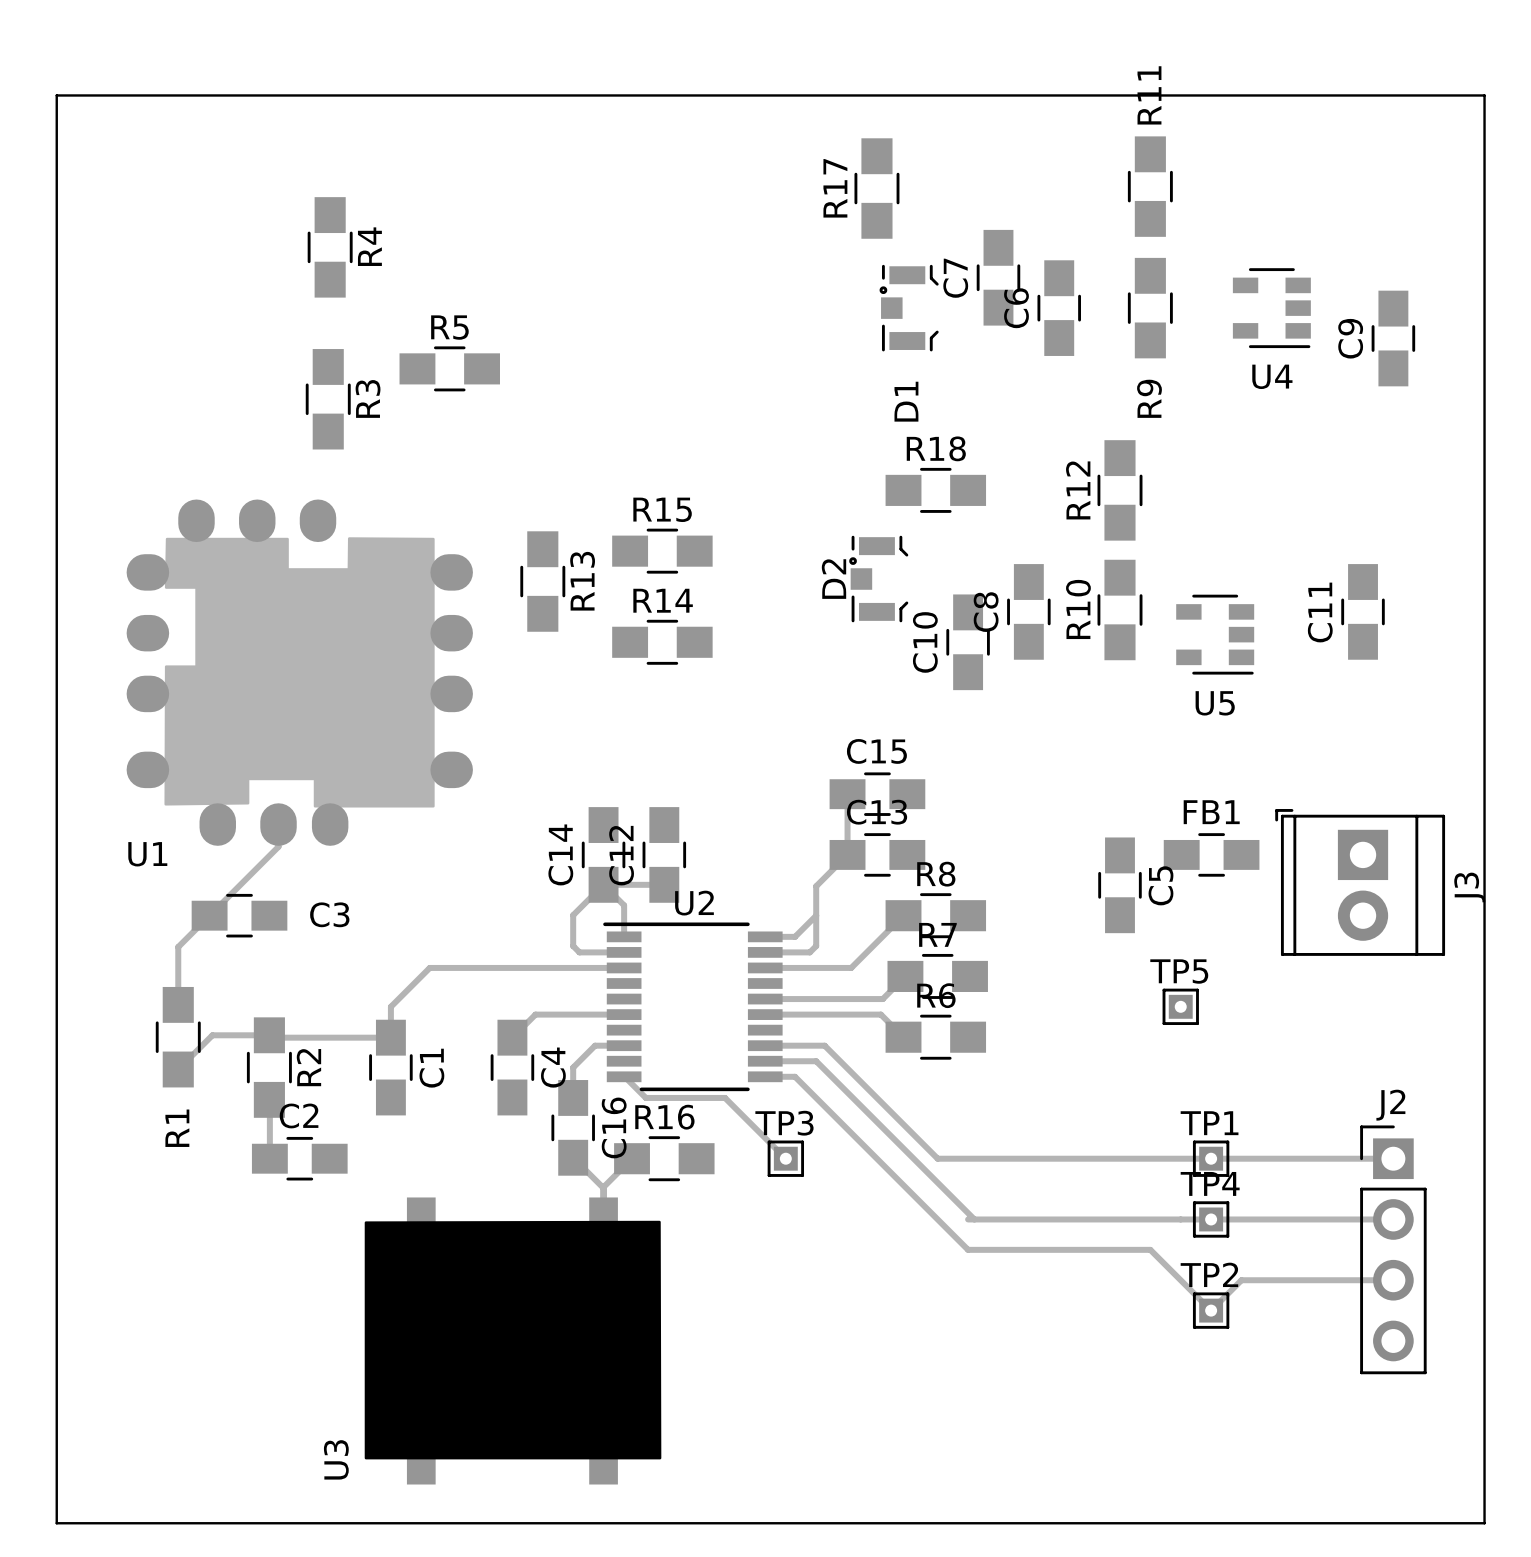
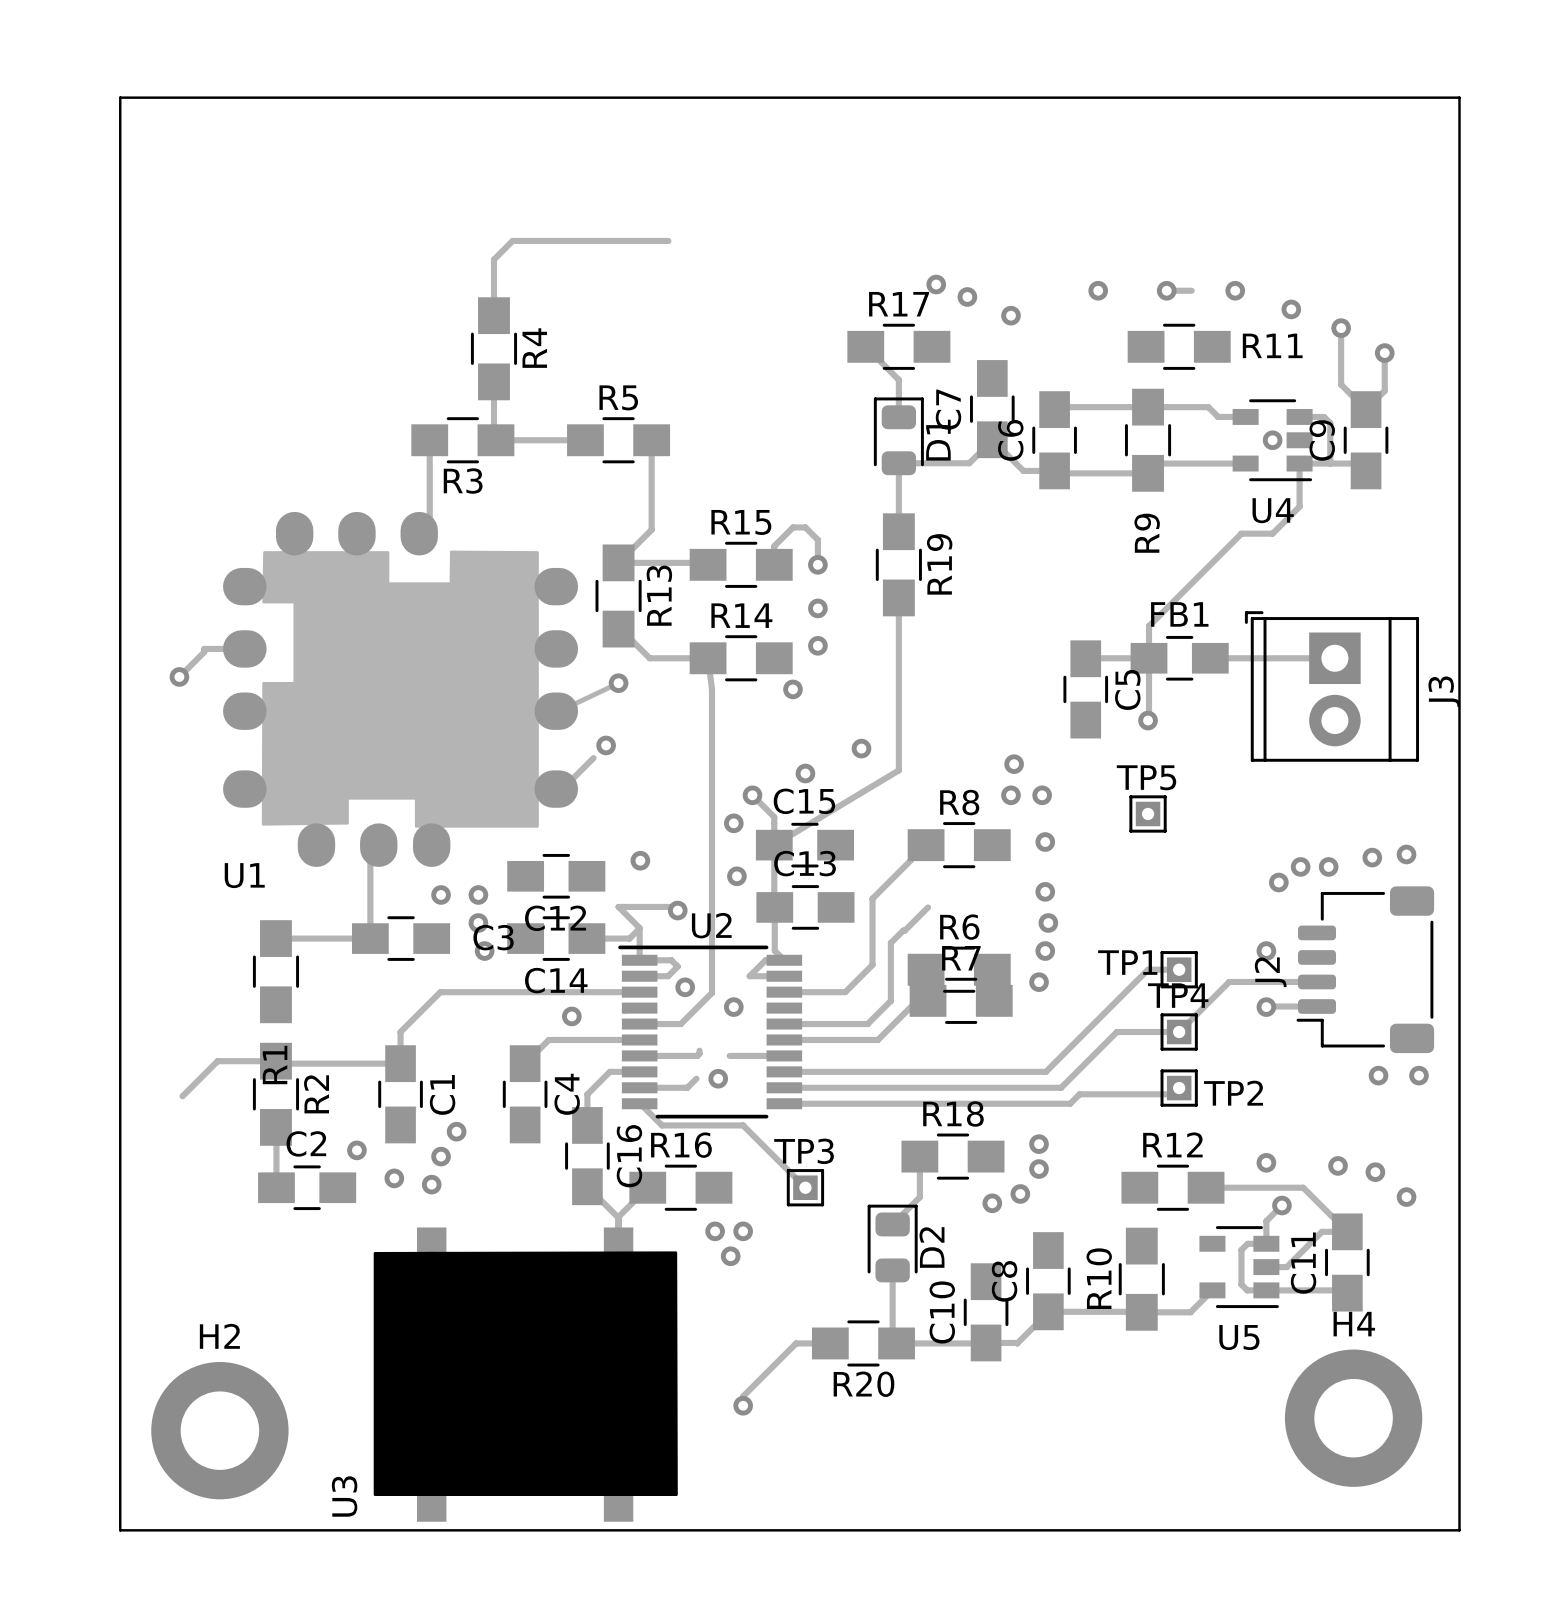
board edge: (117, 95) (56, 95) (56, 1523) (1484, 1523) (1484, 95) (1423, 95) -> (120, 97) (120, 1530) (1459, 1530) (1459, 97)
R11 rotation: 0° (1150, 186) -> 90° clockwise (1179, 346)
R11 position: (1150, 186) -> (1179, 346)
R17 rotation: 0° (876, 188) -> 90° clockwise (898, 346)
R17 position: (876, 188) -> (898, 346)
track: none -> (668, 240) (512, 240) (493, 259) (493, 315)
R4 position: (330, 247) -> (493, 348)
D1 footprint: [879, 264, 939, 352] -> [873, 397, 924, 476]
via: none -> (936, 284)
C7 position: (998, 277) -> (992, 409)
via: none -> (1098, 290)
track: none -> (1166, 290) (1191, 290)
via: none -> (1166, 290)
via: none -> (1235, 290)
via: none -> (967, 296)
via: none -> (1291, 309)
via: none -> (1011, 315)
C6 position: (1059, 308) -> (1054, 440)
R9 position: (1150, 308) -> (1148, 440)
U4 position: (1271, 308) -> (1272, 440)
track: none -> (1341, 328) (1341, 384) (1366, 409) (1384, 390) (1384, 353)
via: none -> (1341, 328)
track: none -> (865, 346) (898, 379) (898, 406)
C9 position: (1393, 338) -> (1366, 440)
via: none -> (1384, 353)
R5 position: (449, 368) -> (618, 440)
track: none -> (493, 381) (493, 438) (495, 440) (585, 440)
R3 rotation: 0° (328, 399) -> 90° clockwise (462, 440)
R3 position: (328, 399) -> (462, 440)
track: none -> (1054, 409) (1057, 407) (1208, 407) (1218, 416) (1245, 416)
D1 name position: D1 (906, 401) -> D1 (938, 440)
track: none -> (1299, 416) (1324, 416) (1330, 423) (1330, 463)
track: none -> (429, 440) (429, 523) (419, 533)
track: none -> (651, 440) (651, 529) (618, 562) (706, 562) (708, 564)
track: none -> (992, 439) (1023, 470) (1054, 470) (1057, 473) (1148, 473) (1157, 463) (1245, 463)
track: none -> (992, 440) (969, 463) (898, 463) (898, 531)
via: none -> (1272, 440)
track: none -> (1366, 470) (1358, 463) (1299, 463) (1299, 506) (1272, 533) (1241, 533) (1149, 626) (1148, 720)
R18 position: (935, 490) -> (952, 1156)
R12 rotation: 0° (1119, 490) -> 90° clockwise (1172, 1187)
R12 position: (1119, 490) -> (1172, 1187)
D2 footprint: [849, 535, 909, 623] -> [867, 1204, 918, 1283]
R15 position: (662, 551) -> (741, 564)
track: none -> (774, 564) (774, 546) (792, 527) (805, 527) (817, 539) (817, 564)
via: none -> (817, 564)
R19: none -> (898, 564)
D2 name position: D2 (833, 579) -> D2 (931, 1247)
R13 position: (542, 581) -> (618, 595)
track: none -> (898, 597) (898, 770) (774, 845)
via: none -> (817, 608)
R10 position: (1119, 609) -> (1141, 1279)
C8 position: (1028, 611) -> (1048, 1281)
C11 position: (1363, 611) -> (1347, 1262)
track: none -> (618, 629) (649, 658) (708, 658) (712, 689) (712, 992) (680, 1024) (639, 1024)
via: none -> (817, 645)
track: none -> (244, 648) (204, 648) (204, 652) (179, 676)
U5 position: (1215, 634) -> (1239, 1267)
R14 position: (662, 642) -> (741, 658)
C10 position: (968, 642) -> (986, 1312)
track: none -> (1149, 658) (1085, 658)
track: none -> (1210, 658) (1334, 658)
via: none -> (179, 676)
track: none -> (618, 683) (559, 711)
via: none -> (618, 683)
U1 position: (299, 672) -> (400, 689)
via: none -> (792, 689)
via: none -> (1148, 720)
via: none -> (606, 745)
via: none -> (861, 748)
track: none -> (593, 758) (562, 789) (556, 789)
via: none -> (1014, 764)
via: none -> (805, 773)
via: none -> (752, 795)
via: none -> (1011, 795)
via: none -> (1042, 795)
track: (847, 794) (847, 854) (816, 886) (816, 946) (809, 952) (765, 952) -> (752, 795) (774, 817) (774, 950) (784, 960) (765, 960) (749, 976) (784, 976)
C15 position: (877, 794) -> (804, 845)
via: none -> (733, 823)
via: none -> (1045, 842)
track: (278, 824) (278, 846) (178, 947) (178, 1004) -> none
track: none -> (378, 845) (370, 853) (370, 938) (275, 938)
via: none -> (1406, 854)
via: none -> (1372, 857)
via: none -> (640, 860)
via: none -> (1300, 866)
via: none -> (1328, 866)
C14 name position: C14 (560, 854) -> C14 (556, 980)
C14 rotation: 0° (603, 854) -> 90° clockwise (556, 938)
C14 position: (603, 854) -> (556, 938)
C12 rotation: 0° (664, 854) -> 90° clockwise (556, 876)
C12 position: (664, 854) -> (556, 876)
via: none -> (736, 876)
C13 position: (877, 854) -> (805, 907)
FB1 position: (1211, 854) -> (1179, 658)
C12 name position: C12 (621, 855) -> C12 (555, 918)
via: none -> (1278, 882)
via: none -> (1045, 891)
via: none -> (441, 894)
via: none -> (478, 894)
J3 position: (1360, 882) -> (1331, 686)
track: (603, 884) (573, 915) (573, 946) (579, 952) (624, 952) -> (639, 960) (671, 960) (677, 966) (668, 976) (639, 976)
C5 position: (1119, 885) -> (1085, 689)
via: none -> (677, 910)
via: none -> (478, 923)
via: none -> (1048, 923)
track: none -> (639, 928) (629, 938) (586, 938)
C3 position: (239, 915) -> (401, 938)
track: (816, 915) (795, 936) (765, 936) -> none
track: (903, 915) (851, 967) (824, 967) -> (926, 845) (872, 898) (872, 964) (845, 992)
R8 position: (935, 915) -> (959, 845)
via: none -> (484, 951)
via: none -> (1045, 951)
via: none -> (1266, 951)
via: none -> (1039, 982)
via: none -> (685, 987)
track: (905, 976) (882, 999) (846, 999) -> (928, 907) (890, 942) (890, 1000) (867, 1024)
track: none -> (1317, 1006) (1266, 1007)
via: none -> (733, 1007)
via: none -> (1266, 1007)
via: none -> (571, 1016)
TP5 position: (1180, 1006) -> (1148, 813)
track: (856, 1014) (880, 1014) (903, 1037) -> (877, 1039) (926, 991) (926, 969)
track: none -> (699, 1050) (697, 1055) (639, 1055)
track: none -> (729, 1055) (784, 1055)
R1 position: (178, 1037) -> (275, 971)
R6 position: (935, 1037) -> (959, 969)
track: (824, 1045) (937, 1158) (1176, 1158) -> (845, 1071) (1045, 1071) (1148, 969) (1179, 969)
via: none -> (1378, 1075)
via: none -> (1419, 1075)
track: none -> (696, 1078) (687, 1087) (639, 1087)
via: none -> (718, 1078)
track: (816, 1061) (974, 1219) -> (836, 1087) (1061, 1087) (1116, 1032) (1179, 1032) (1229, 981) (1317, 981)
track: (795, 1076) (968, 1249) (1150, 1249) (1211, 1310) (1241, 1280) (1393, 1280) -> (814, 1103) (1070, 1103) (1079, 1094) (1172, 1094) (1179, 1088)
via: none -> (456, 1131)
J2 name position: J2 (1390, 1105) -> J2 (1270, 972)
via: none -> (1039, 1144)
via: none -> (356, 1150)
TP1 name position: TP1 (1209, 1123) -> TP1 (1127, 962)
J2 footprint: [1360, 1125, 1427, 1375] -> [1296, 886, 1435, 1054]
via: none -> (441, 1156)
track: none -> (919, 1156) (919, 1197) (892, 1224)
via: none -> (1266, 1162)
via: none -> (1338, 1165)
via: none -> (1039, 1169)
via: none -> (1375, 1172)
via: none -> (394, 1178)
via: none -> (431, 1184)
TP1 position: (1211, 1158) -> (1179, 969)
track: (1271, 1158) (1393, 1158) -> (1303, 1187) (1347, 1231) (1321, 1231) (1286, 1267) (1266, 1267)
via: none -> (1020, 1193)
via: none -> (1406, 1197)
via: none -> (992, 1203)
track: none -> (1281, 1205) (1266, 1221) (1266, 1243) (1247, 1243) (1241, 1250) (1241, 1284) (1247, 1290) (1344, 1290) (1347, 1293)
via: none -> (1281, 1205)
via: none -> (715, 1231)
via: none -> (743, 1231)
track: (968, 1219) (1393, 1219) -> none
TP4 position: (1211, 1219) -> (1179, 1032)
via: none -> (730, 1256)
track: none -> (892, 1270) (892, 1339) (896, 1343) (1017, 1343) (1048, 1311) (1190, 1312) (1212, 1290)
TP2 name position: TP2 (1209, 1274) -> TP2 (1233, 1093)
track: none -> (830, 1343) (796, 1343) (743, 1396) (743, 1405)
R20: none -> (863, 1343)
TP2 position: (1211, 1310) -> (1179, 1088)
via: none -> (743, 1405)
H4: none -> (1353, 1418)
H2: none -> (219, 1430)

